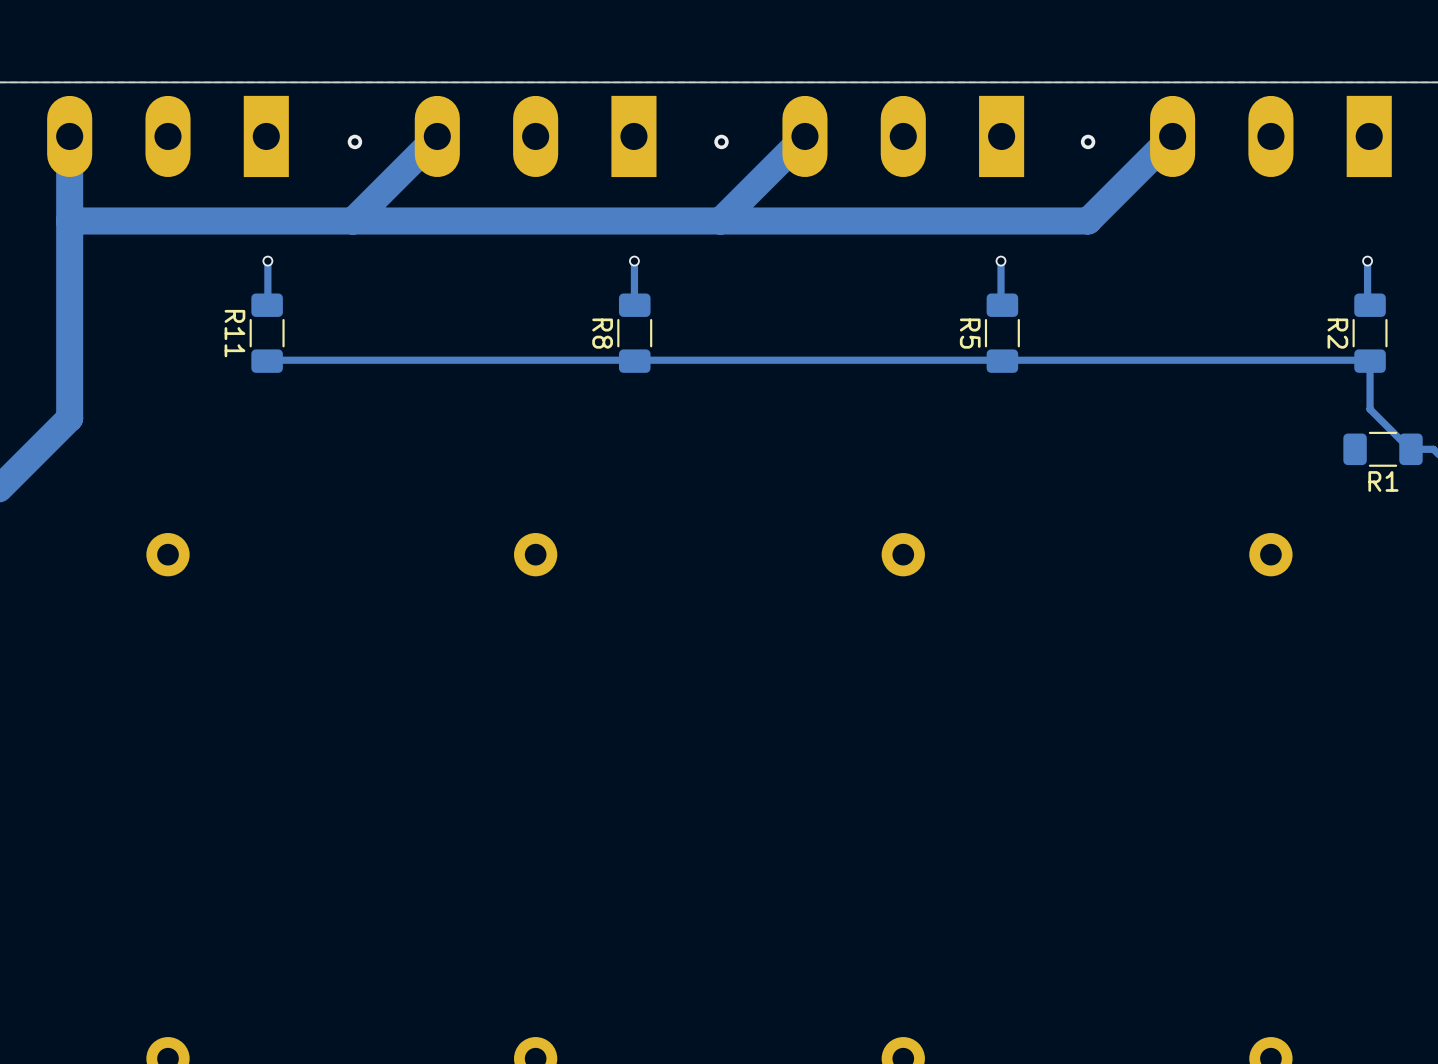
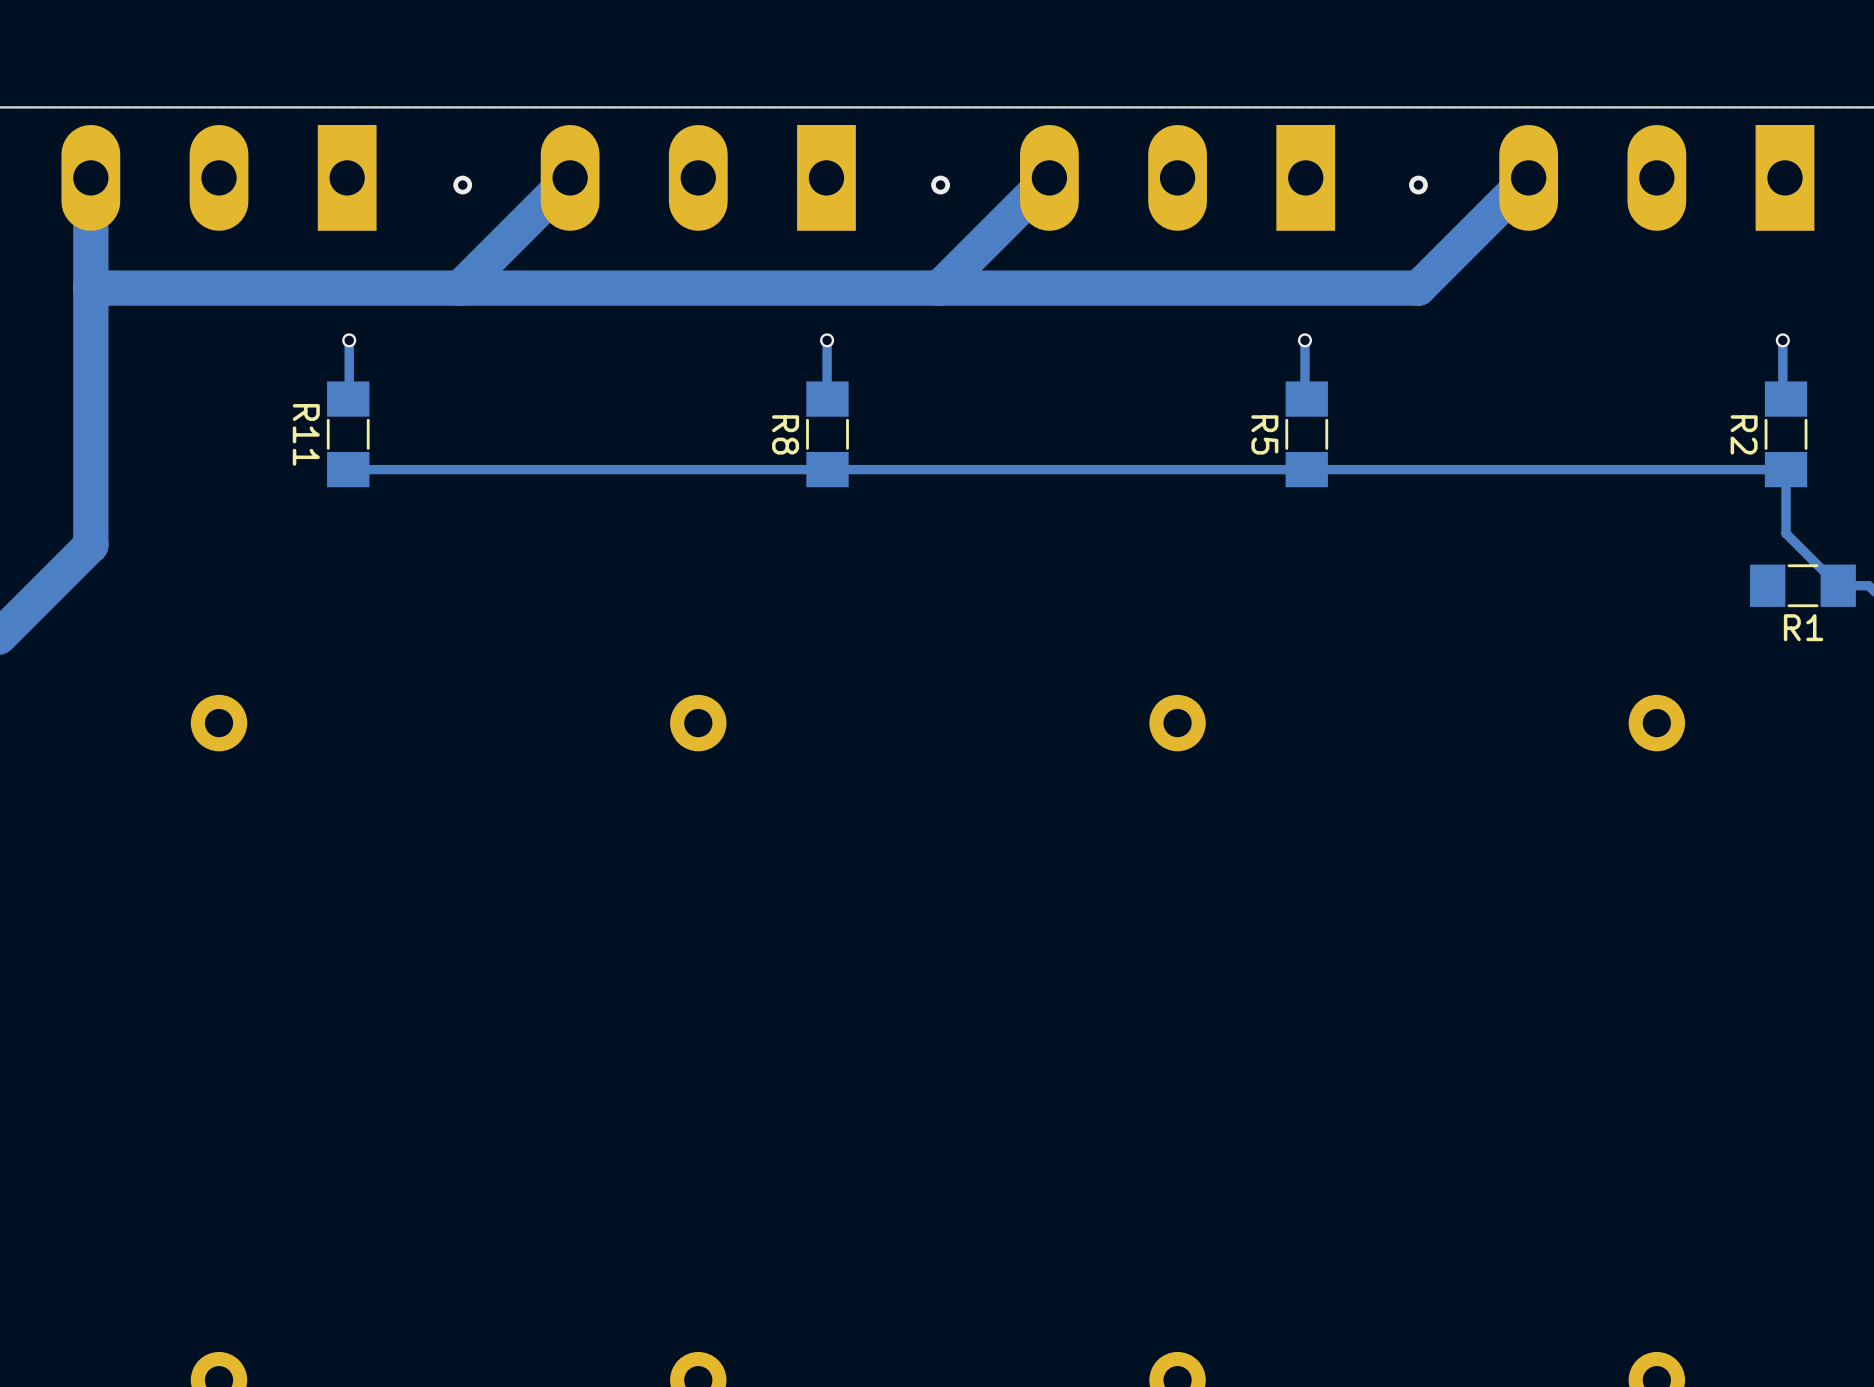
R11 footprint: [249, 293, 285, 373] -> [326, 381, 370, 488]
R8 footprint: [617, 293, 653, 373] -> [806, 381, 849, 488]
R5 footprint: [984, 293, 1020, 373] -> [1285, 381, 1329, 488]
R2 footprint: [1352, 293, 1388, 373] -> [1764, 381, 1808, 488]
R1 footprint: [1343, 431, 1423, 467] -> [1750, 564, 1856, 608]

